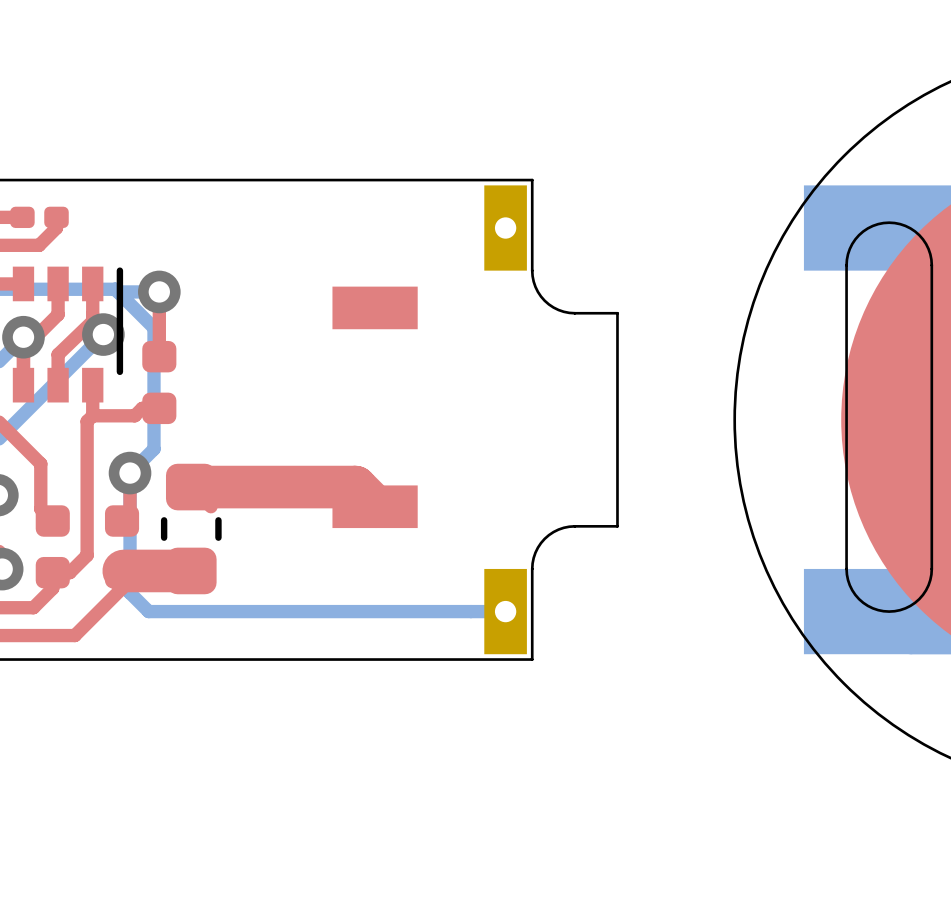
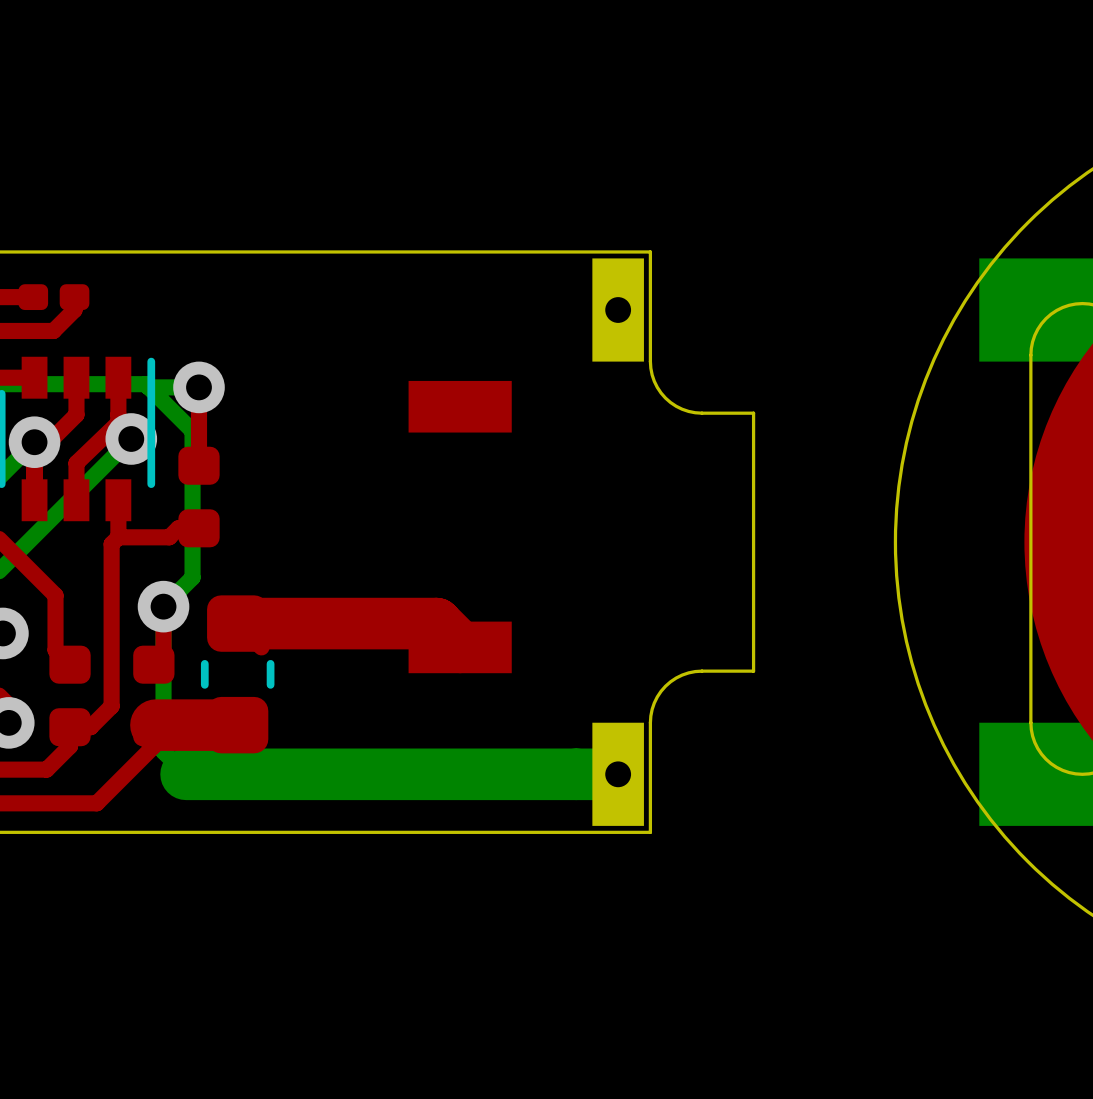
bottom track width: thin (148, 611) (505, 611) -> thick (186, 774) (618, 774)

